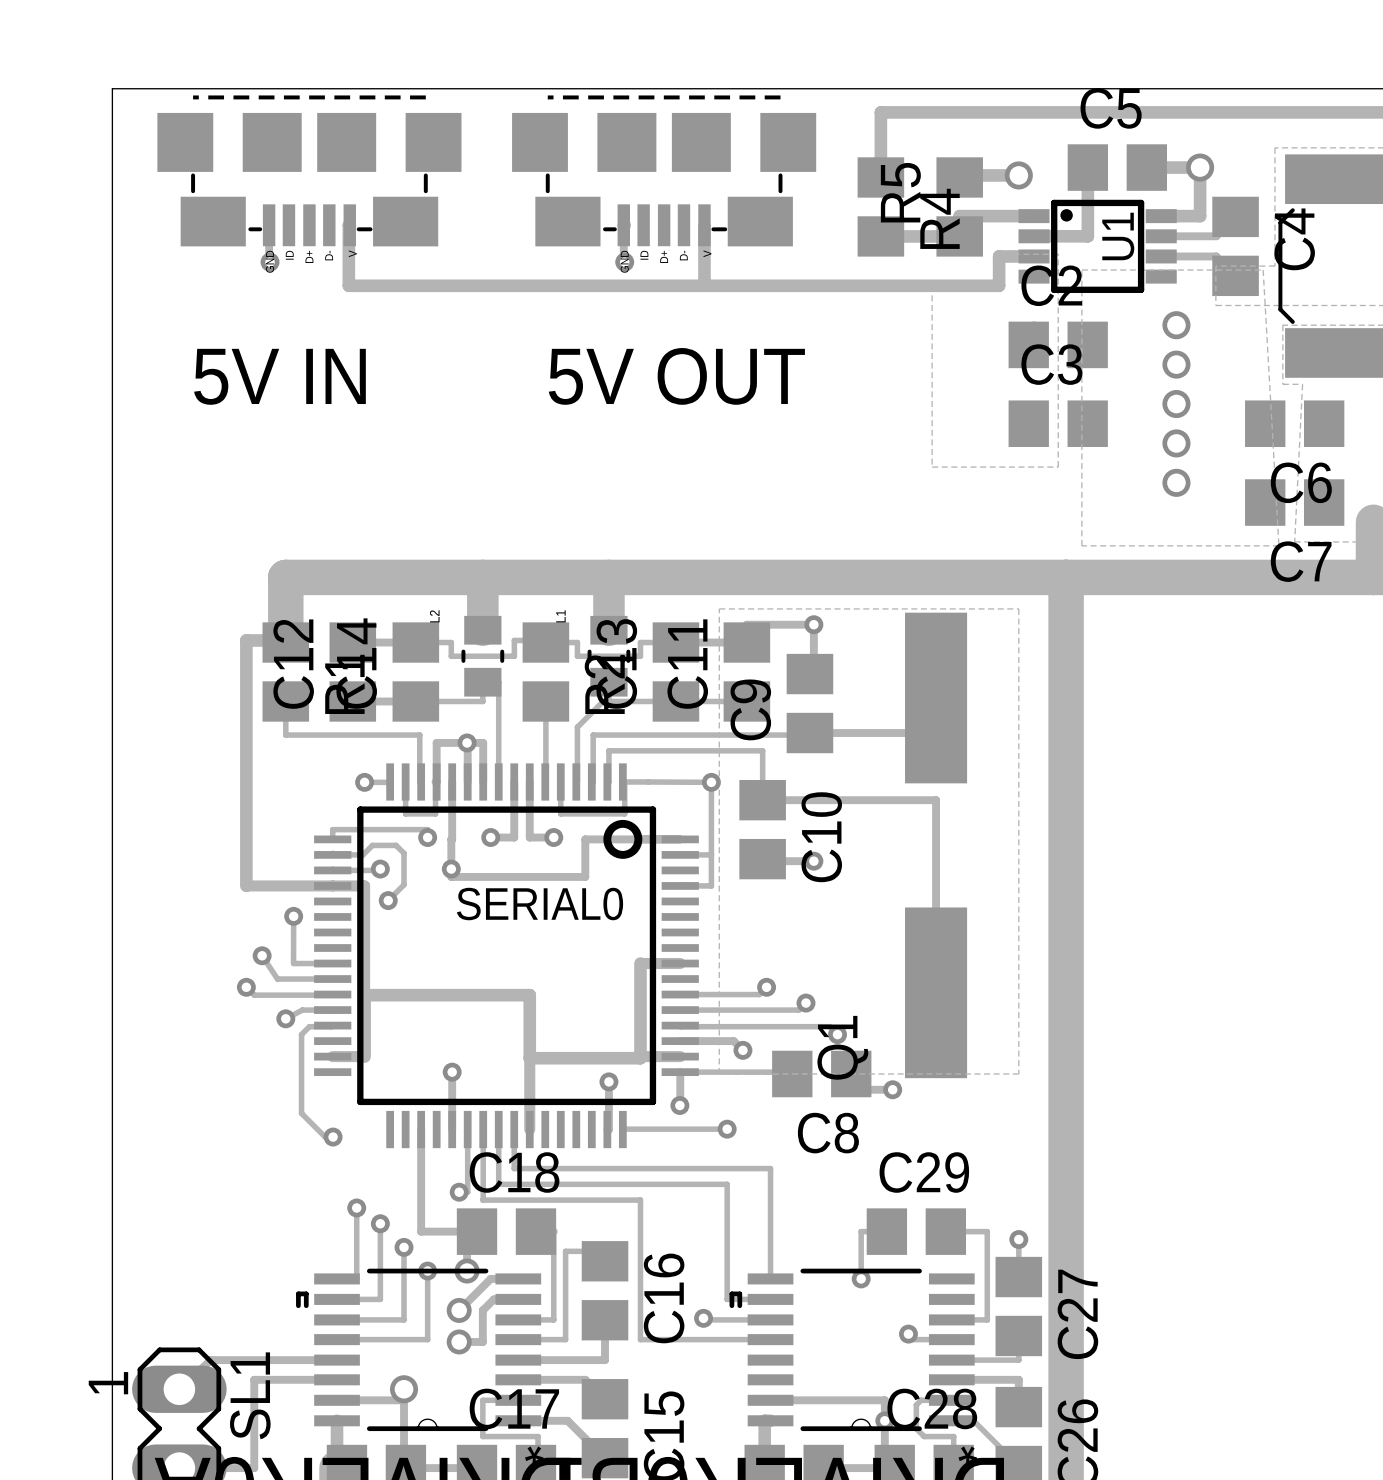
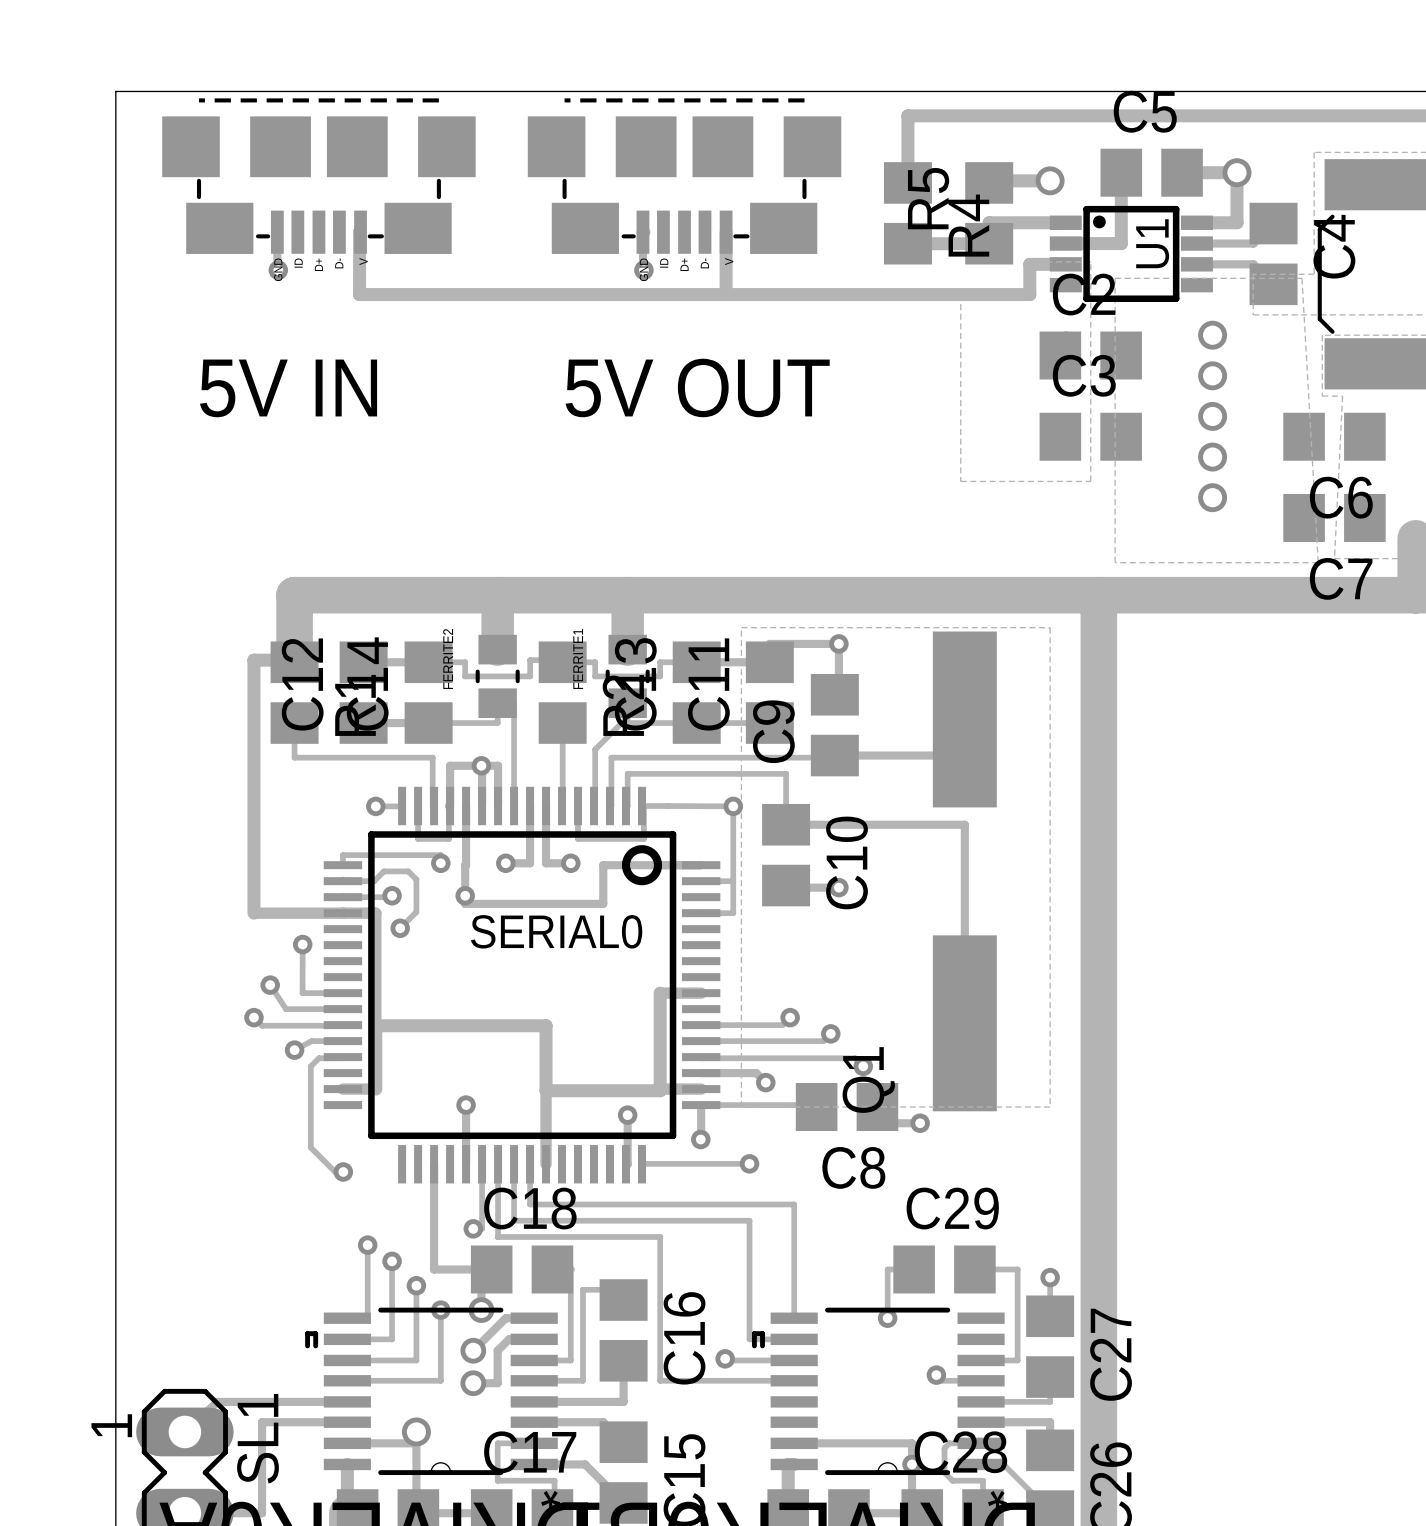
L2 name: L2 (434, 616) -> FERRITE2 (448, 659)
L1 name: L1 (560, 616) -> FERRITE1 (578, 659)

